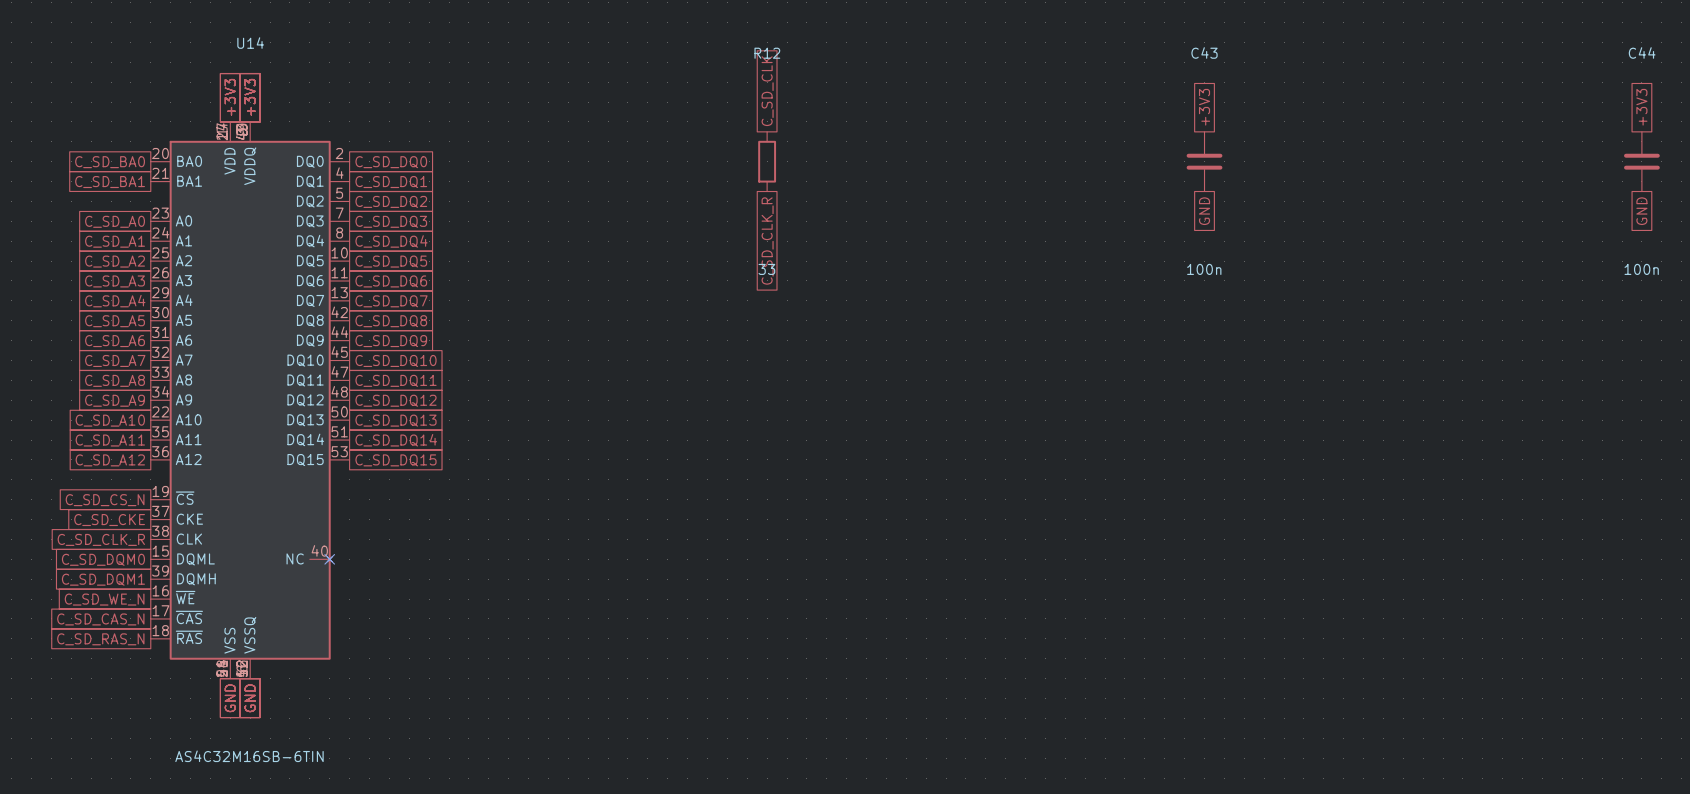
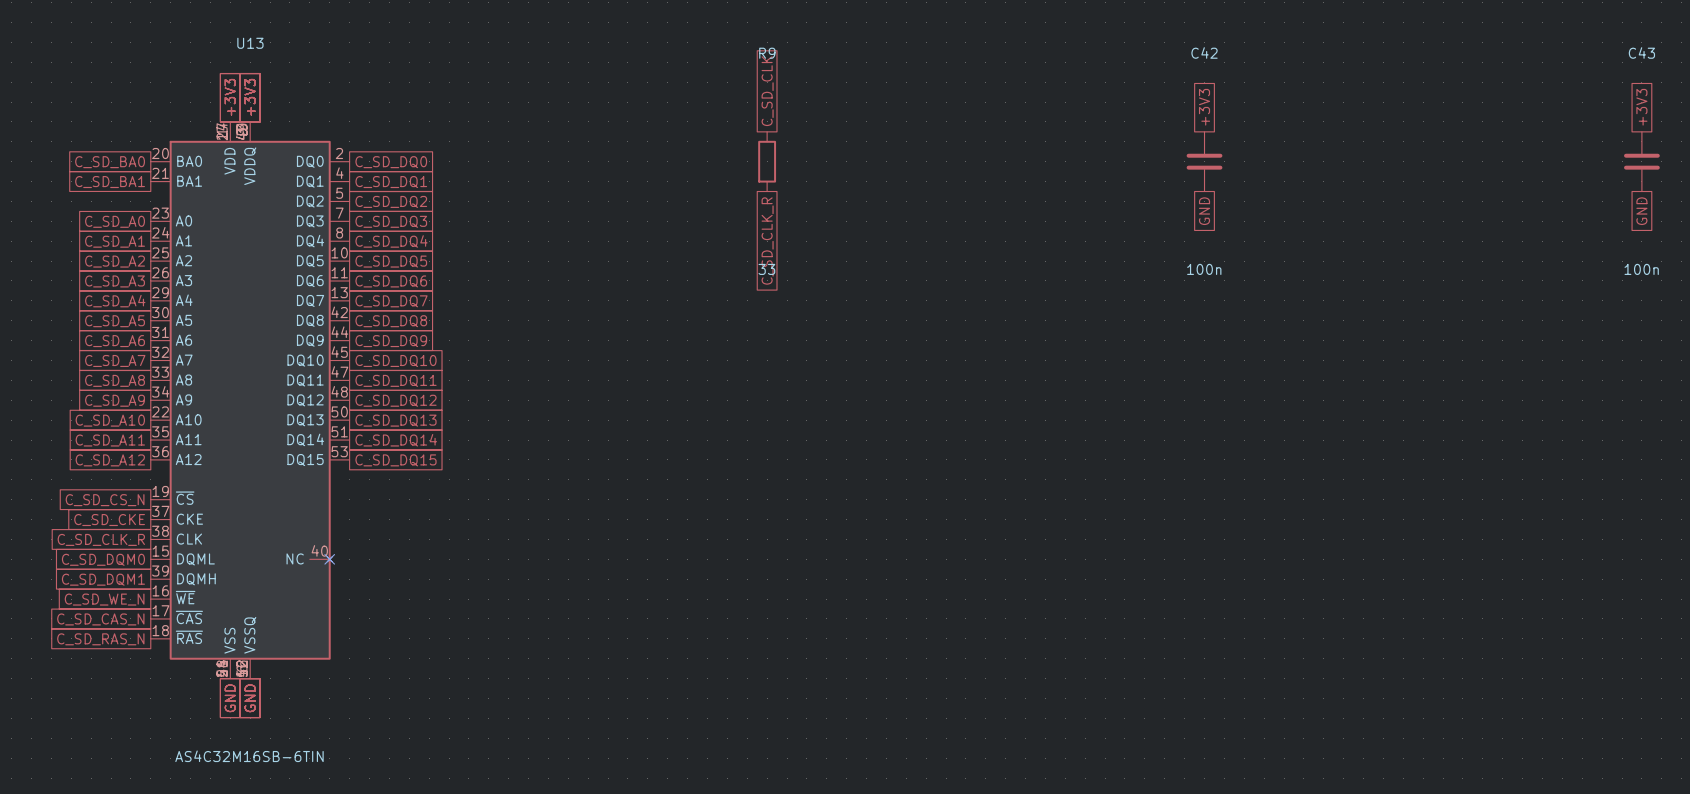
U14 name: U14 (250, 43) -> U13 (250, 43)
C43 name: C43 (1204, 52) -> C42 (1204, 52)
C44 name: C44 (1642, 52) -> C43 (1641, 52)
R12 name: R12 (767, 53) -> R9 (767, 53)

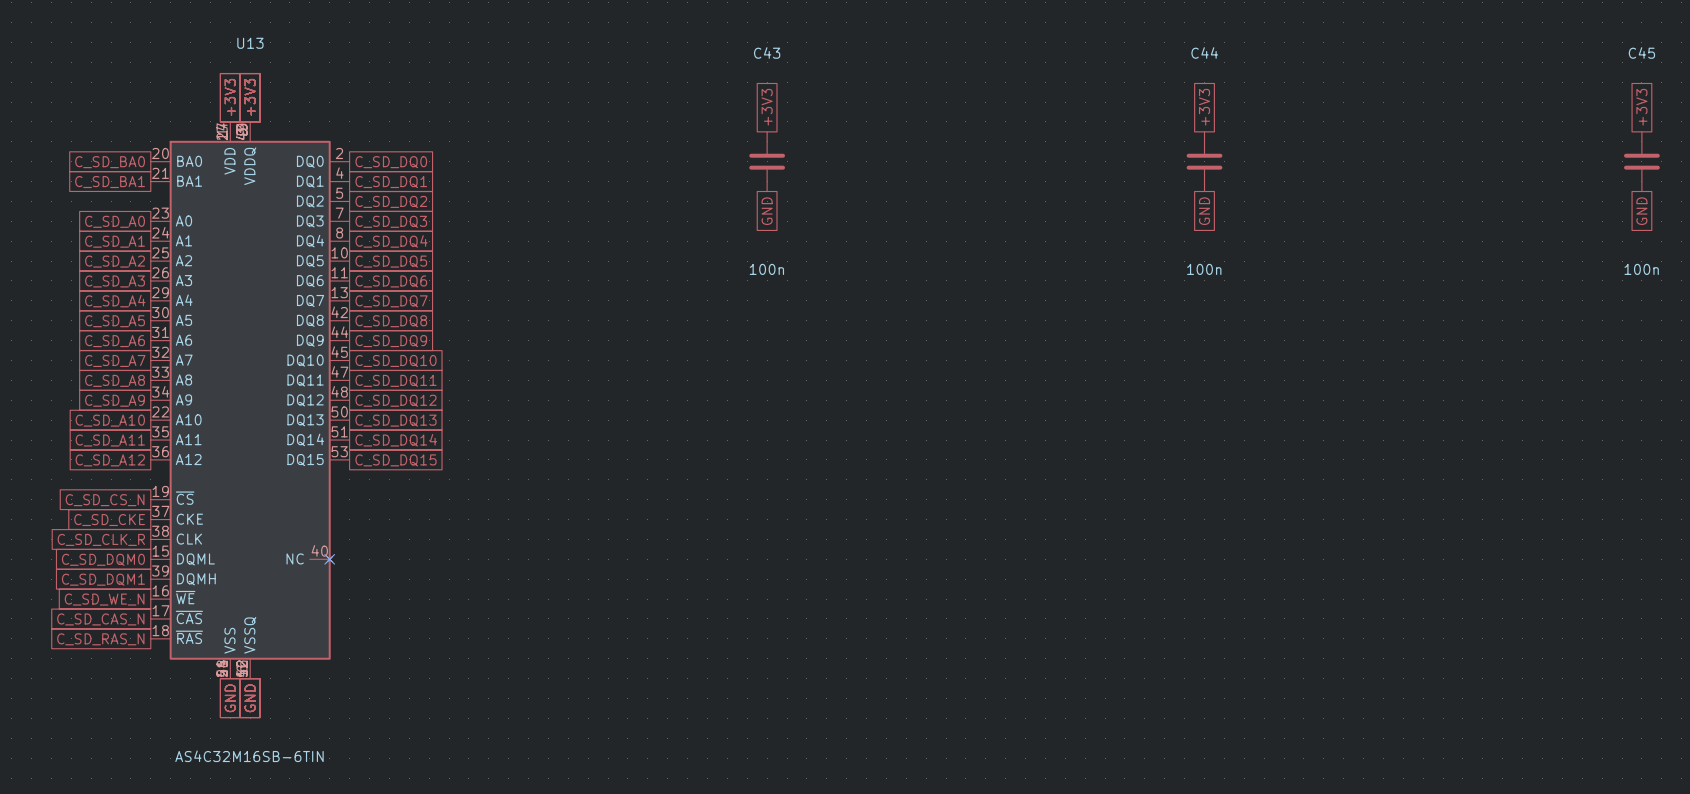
C42 name: C42 (1204, 52) -> C44 (1204, 52)
C43 name: C43 (1641, 52) -> C45 (1641, 52)
global label: C_SD_CLK (767, 91) -> +3V3 (767, 107)
R9: 33 (767, 161) -> none
C43: none -> 100n (767, 161)
global label: C_SD_CLK_R (767, 241) -> GND (767, 211)

